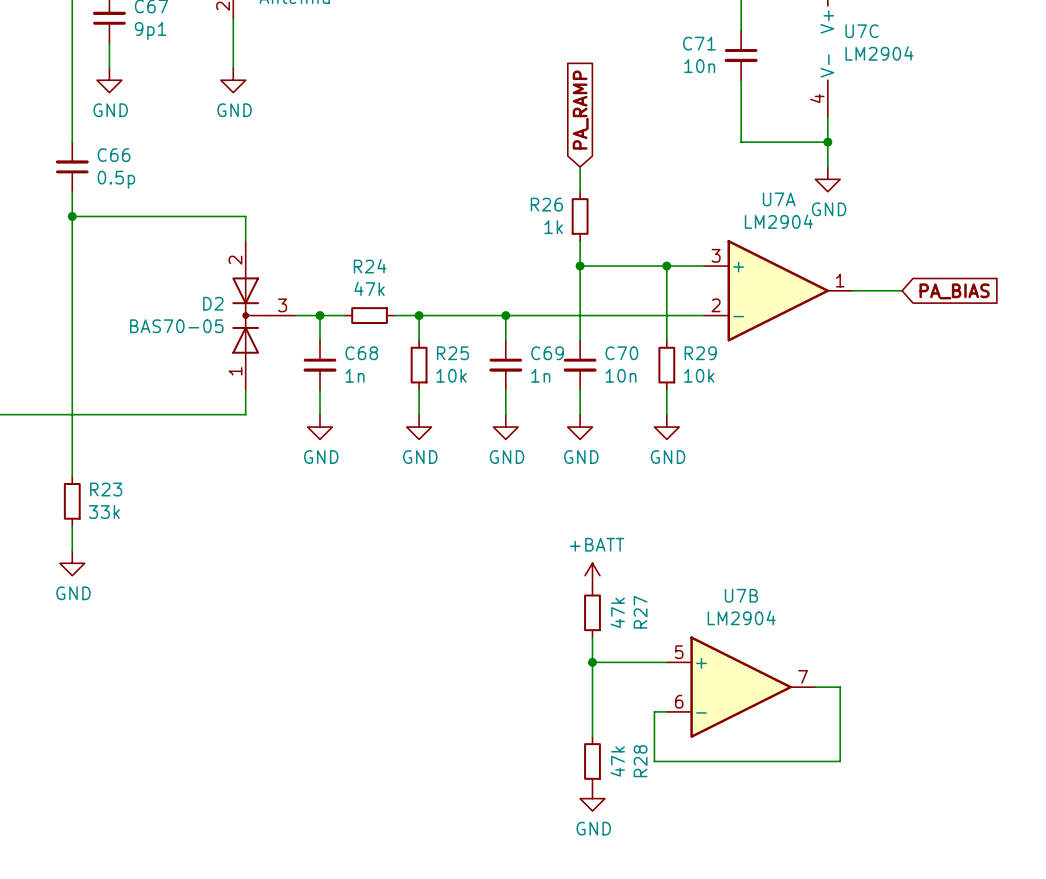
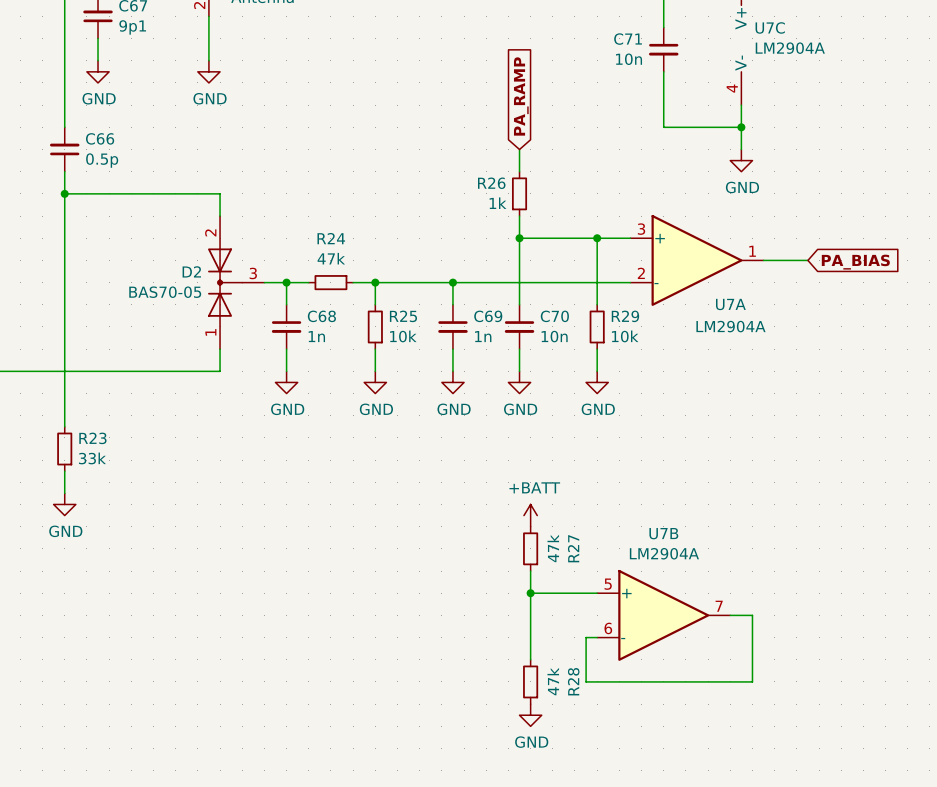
U7C value: LM2904 (879, 53) -> LM2904A (790, 48)
U7A name position: U7A (779, 199) -> U7A (730, 304)
U7A value: LM2904 (778, 221) -> LM2904A (730, 326)
U7B value: LM2904 (741, 618) -> LM2904A (664, 553)

